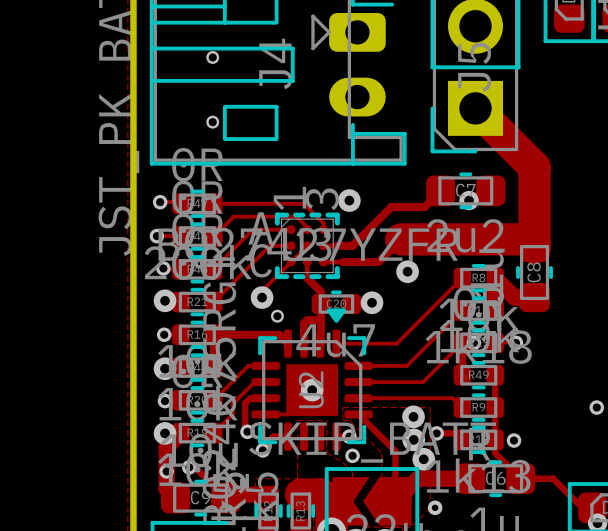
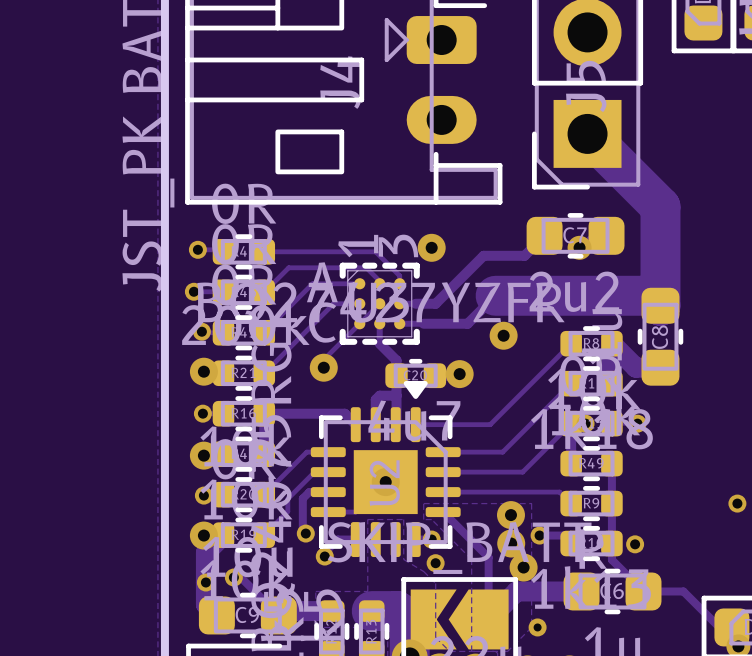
via: (212, 57) -> none
via: (212, 122) -> none
via: (277, 316) -> none

